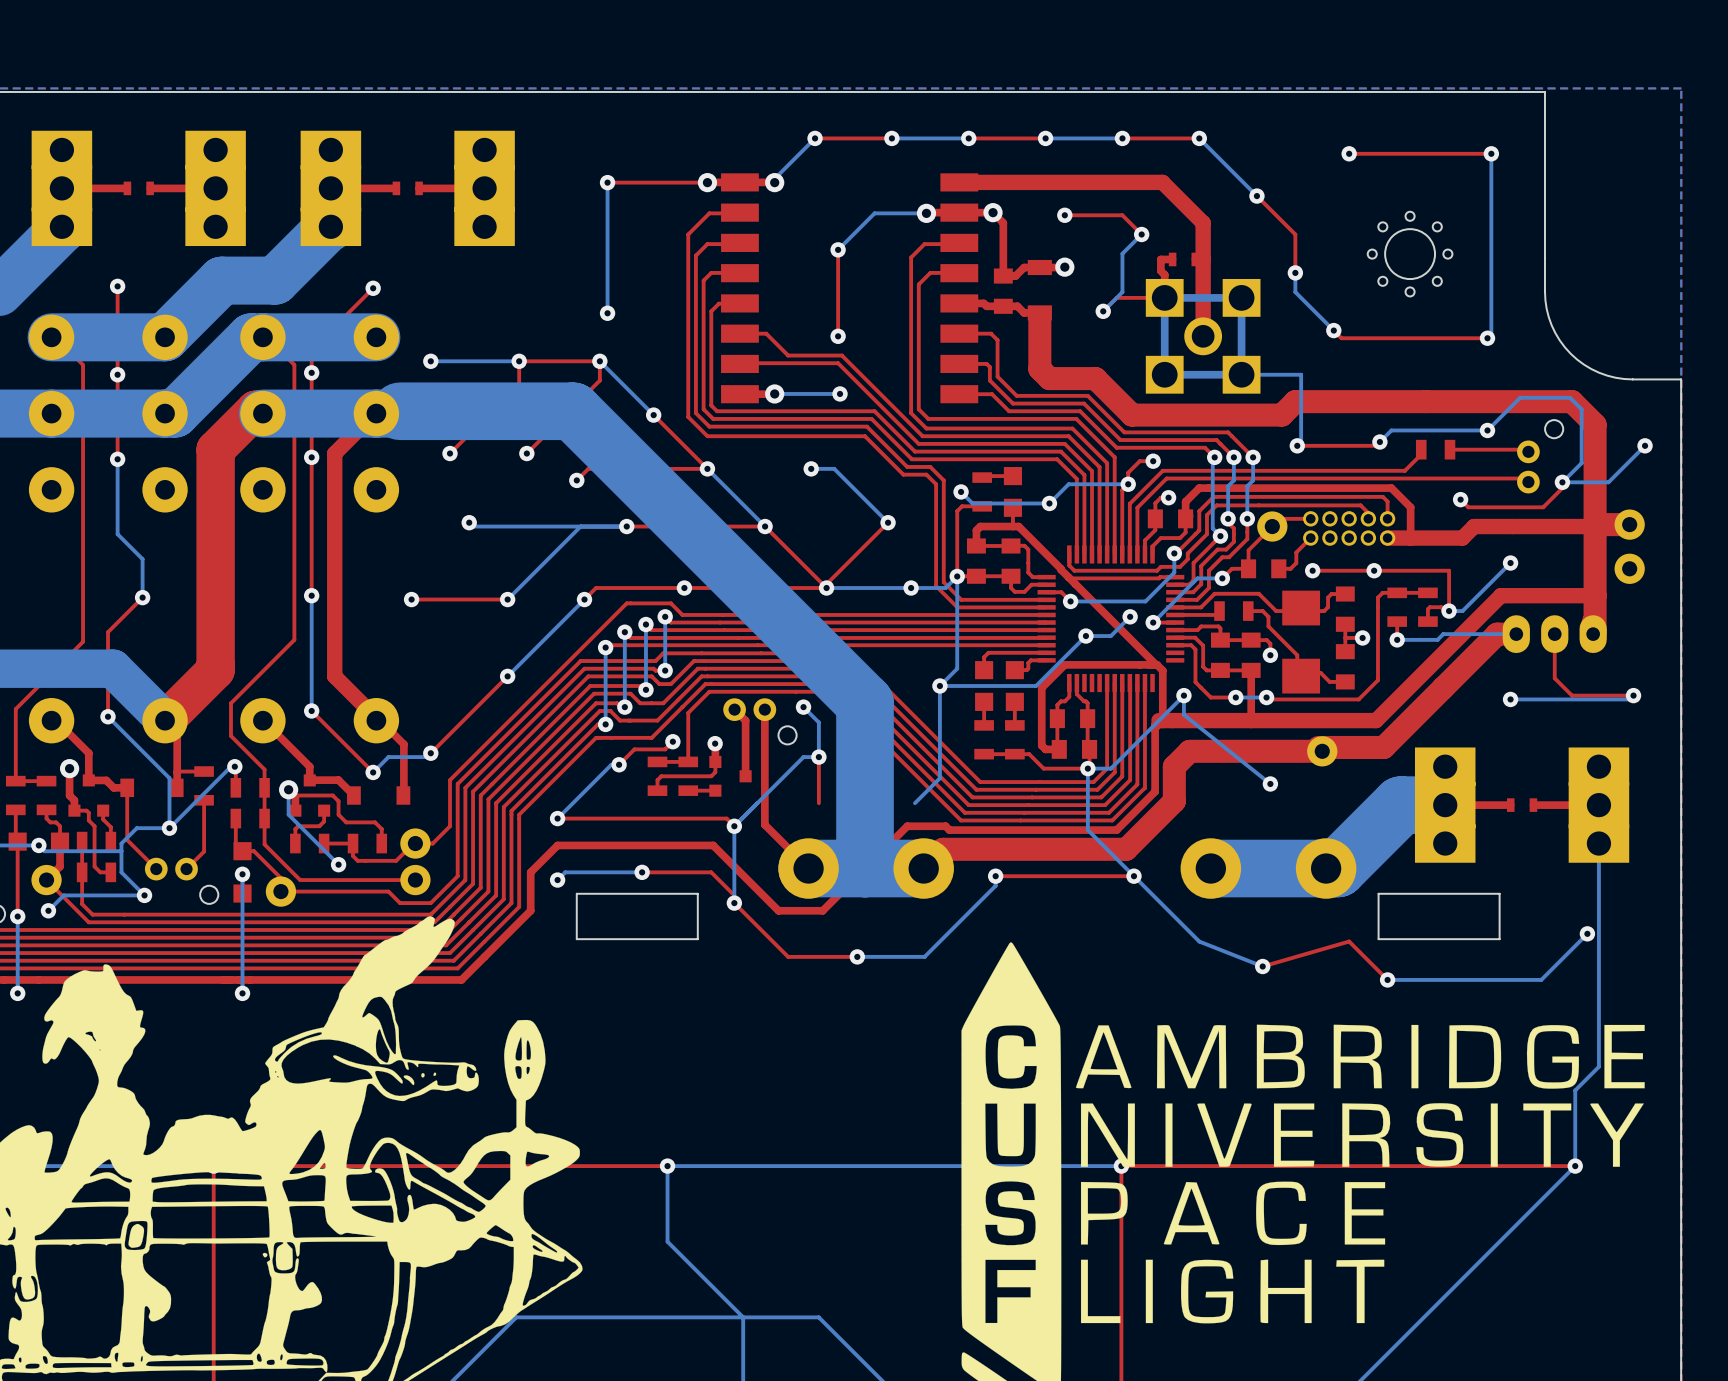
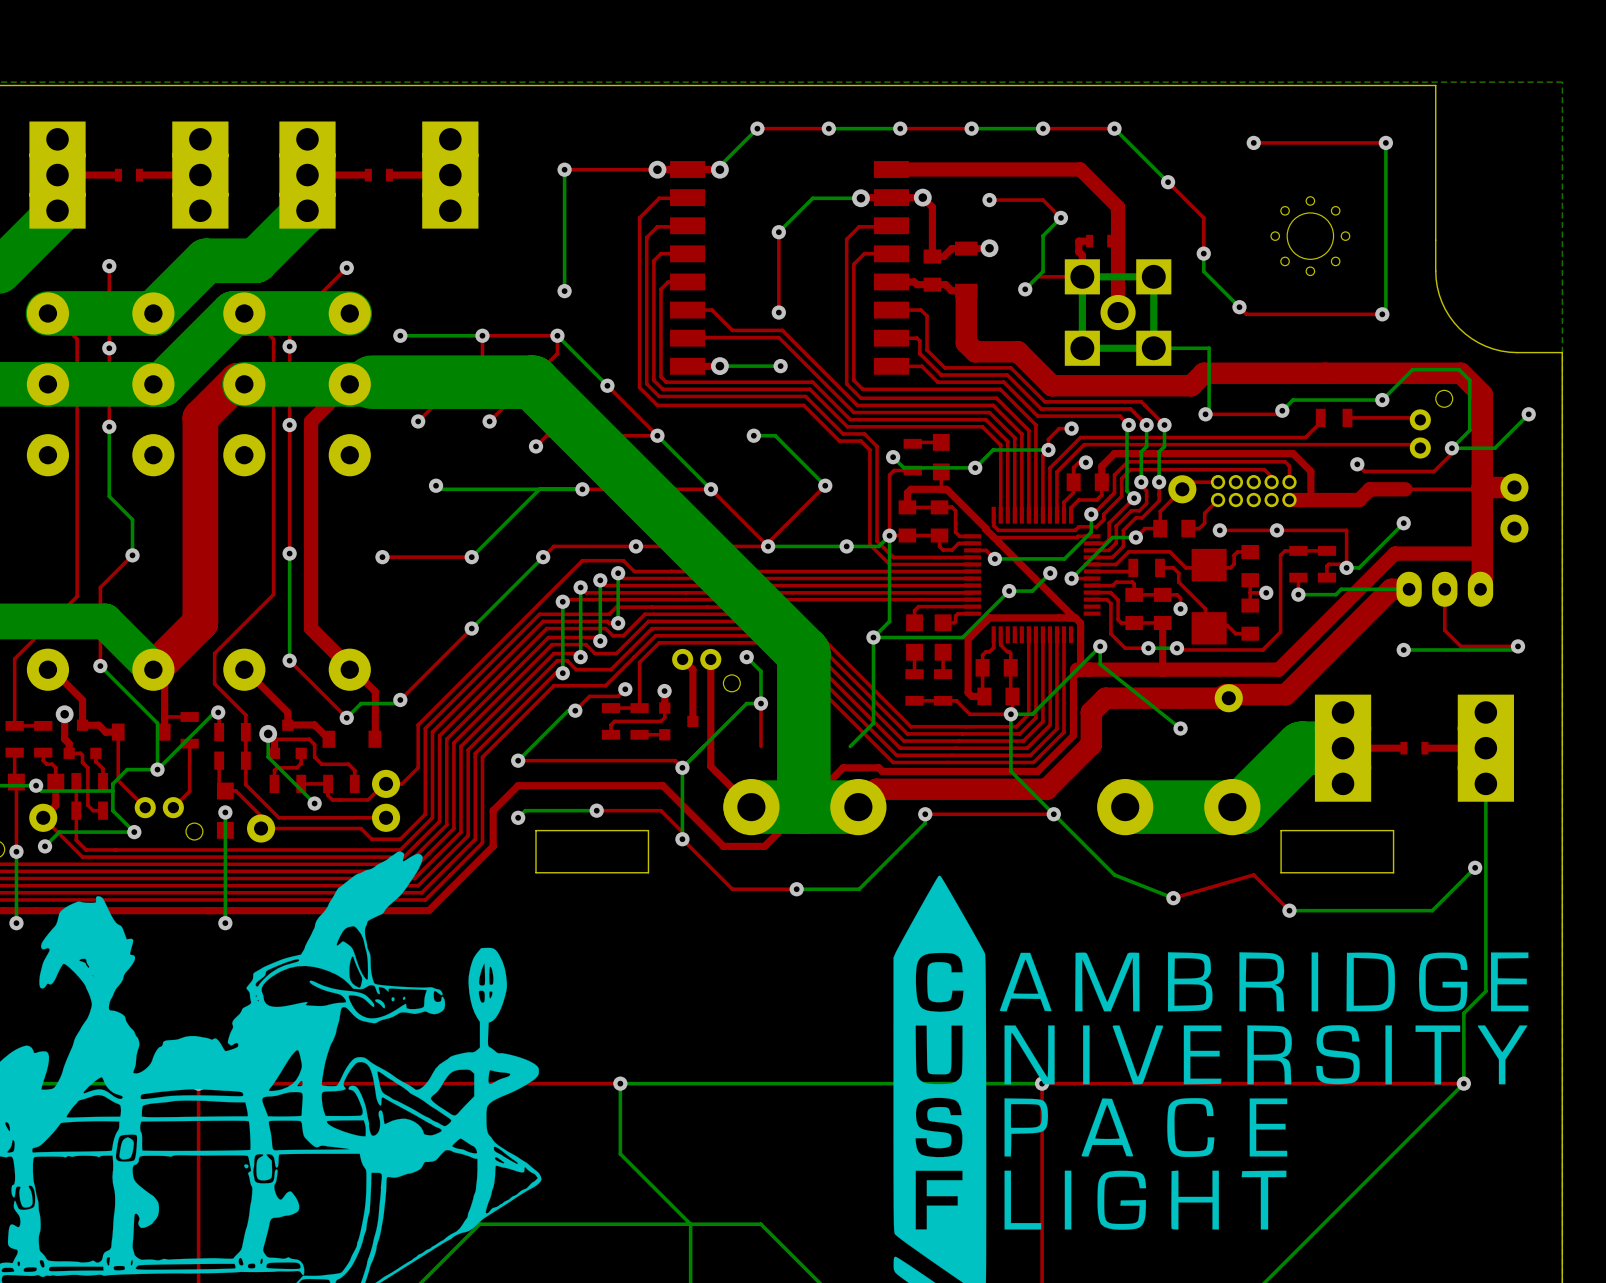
top track width: thick (1595, 526) (1512, 526) -> thin (1482, 489) (1405, 489)

